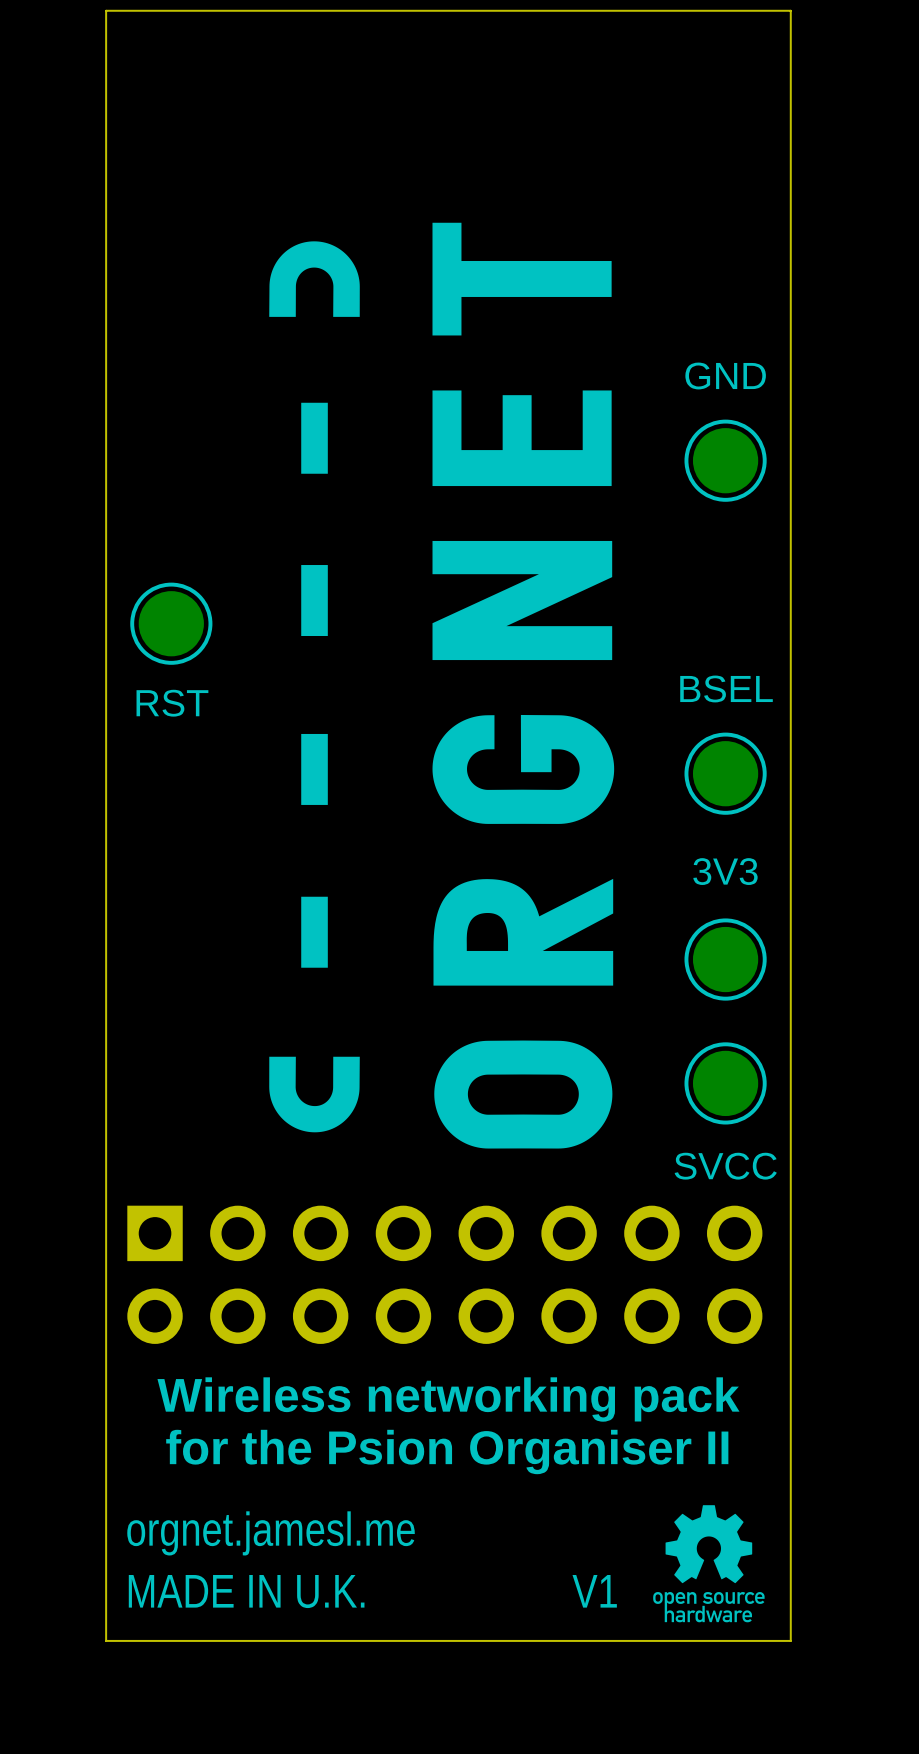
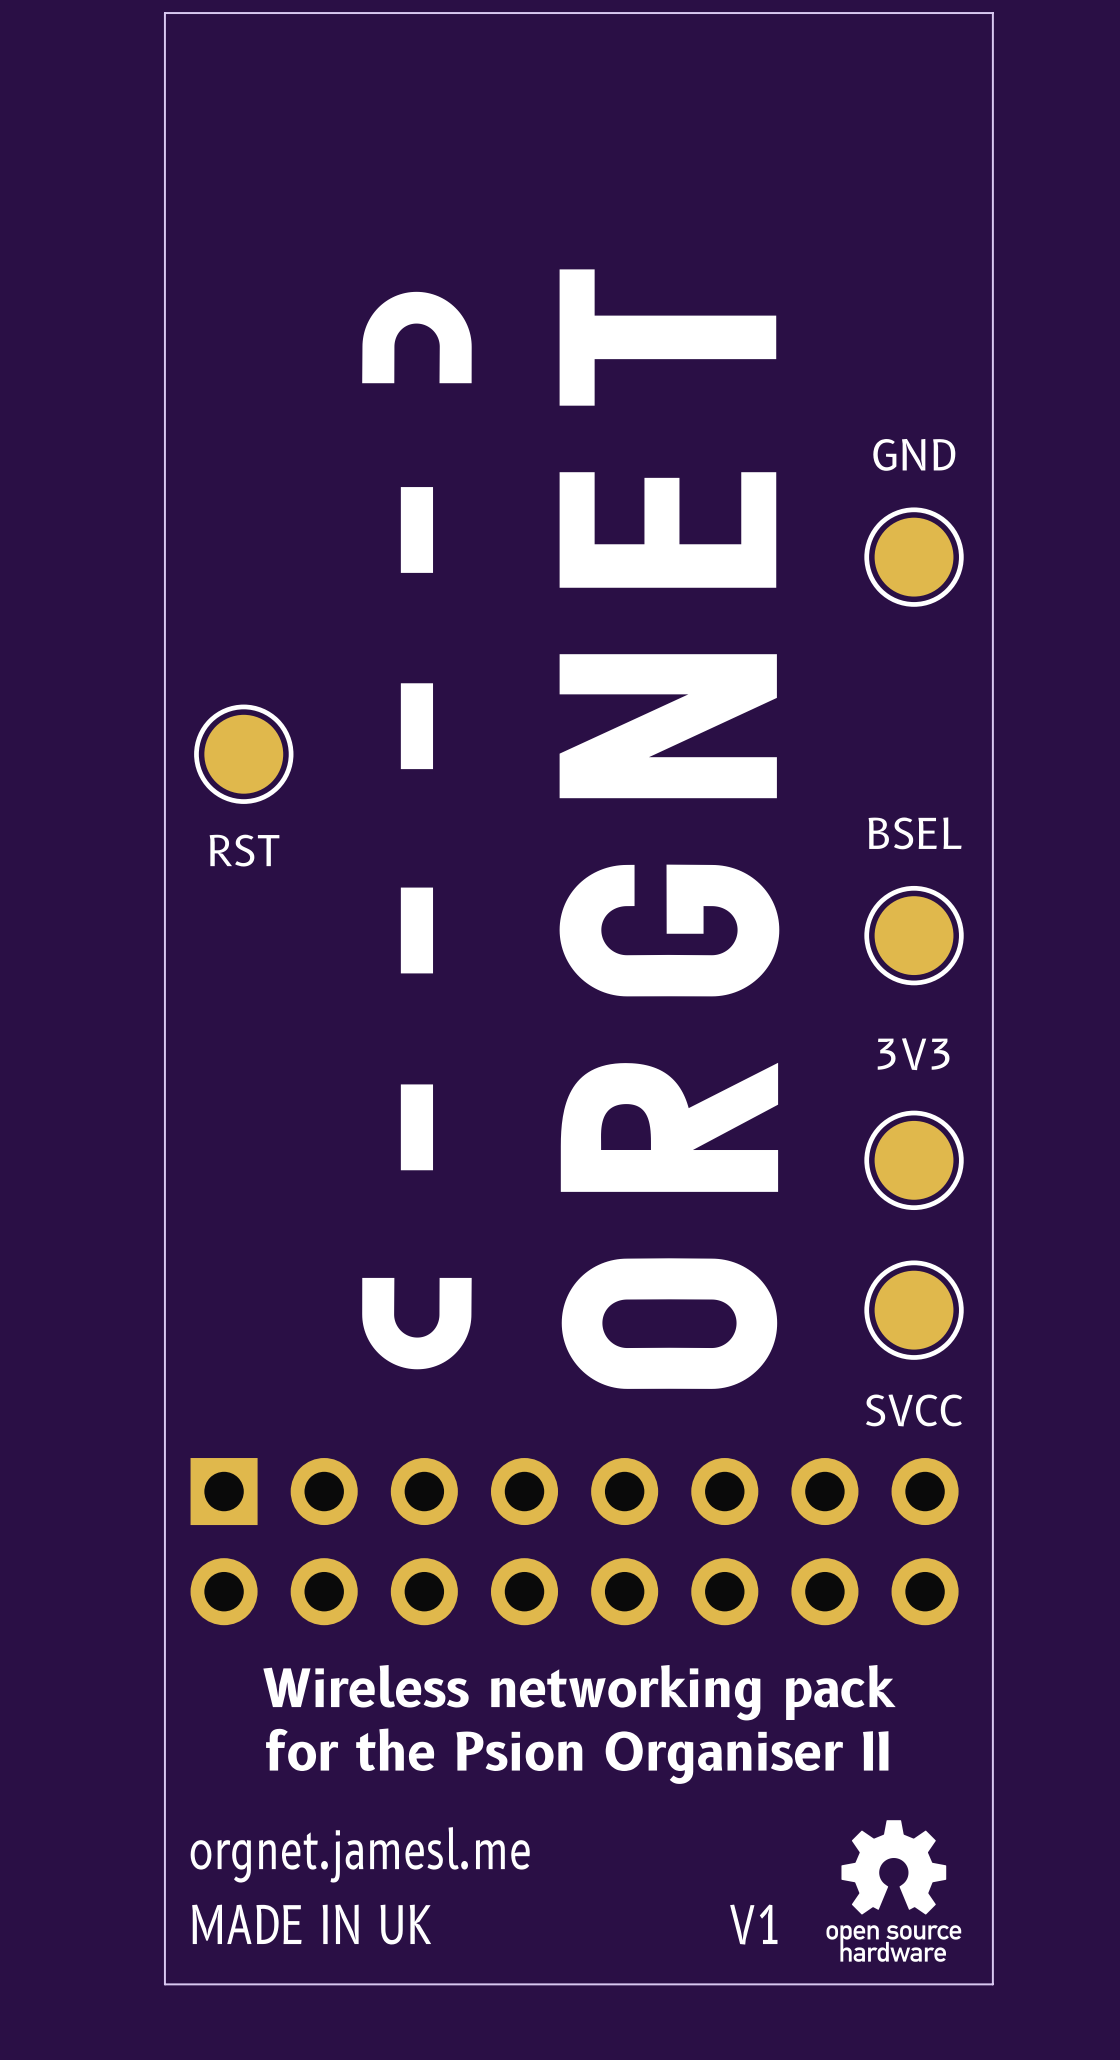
text: MADE IN U.K. (246, 1591) -> MADE IN UK (311, 1924)

